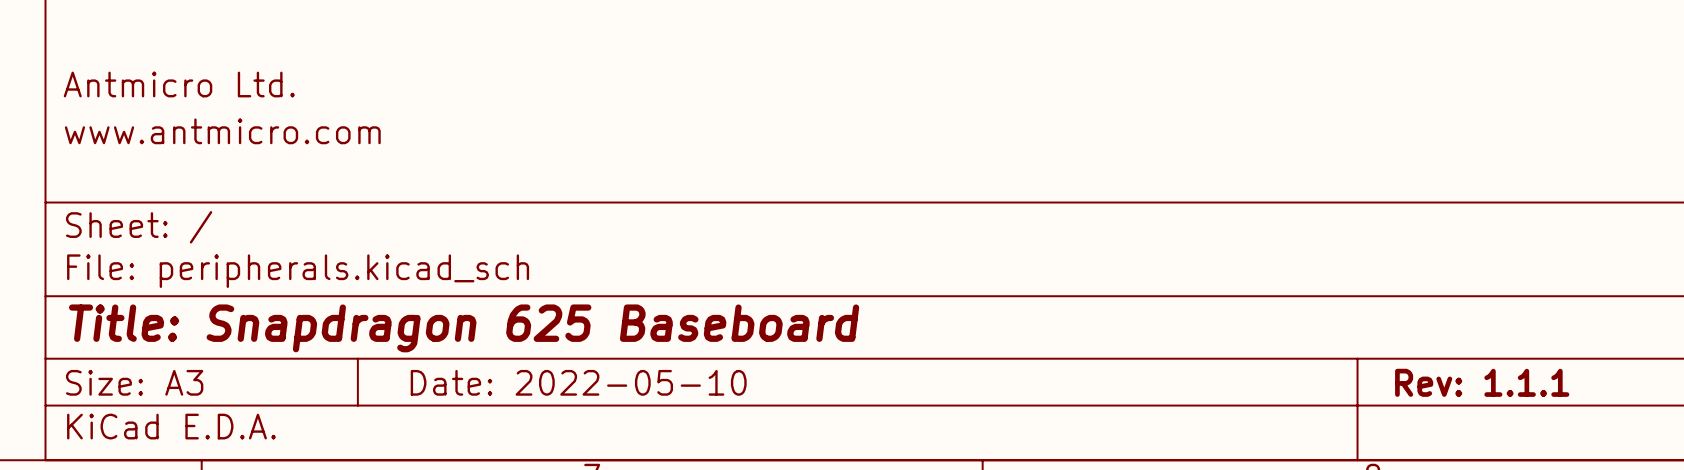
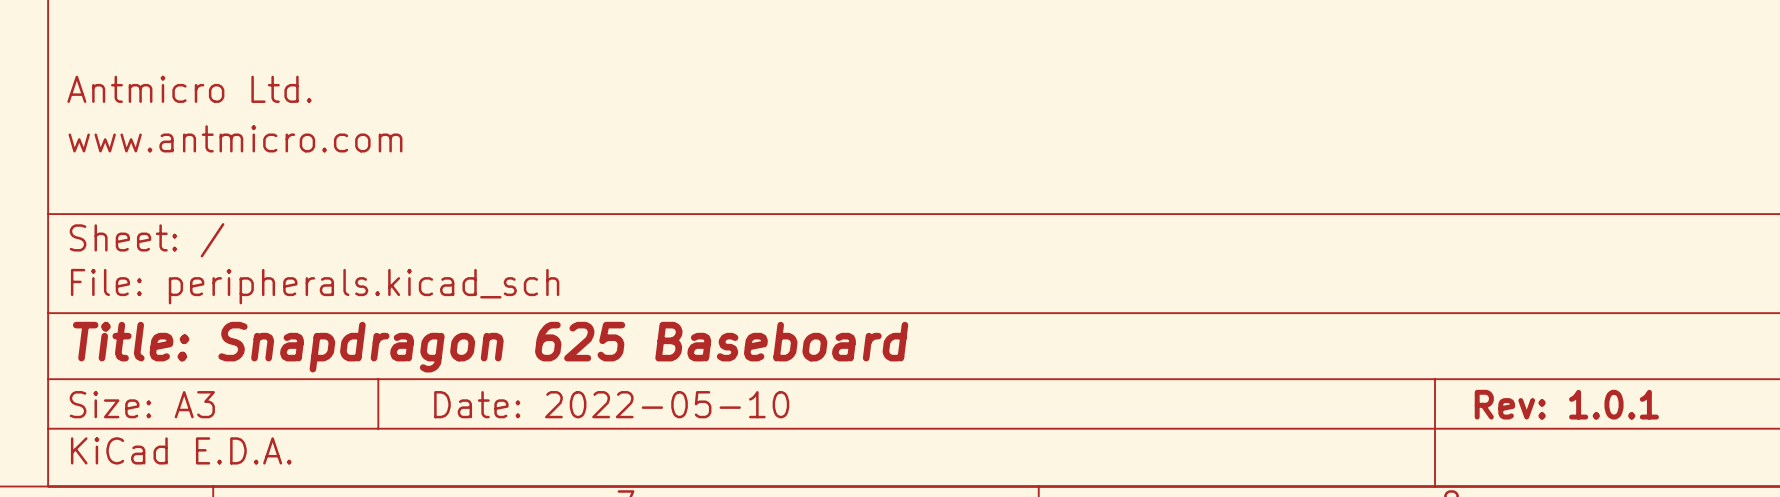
title block: Rev: 1.1.1 (1482, 382) -> Rev: 1.0.1 (1566, 404)

